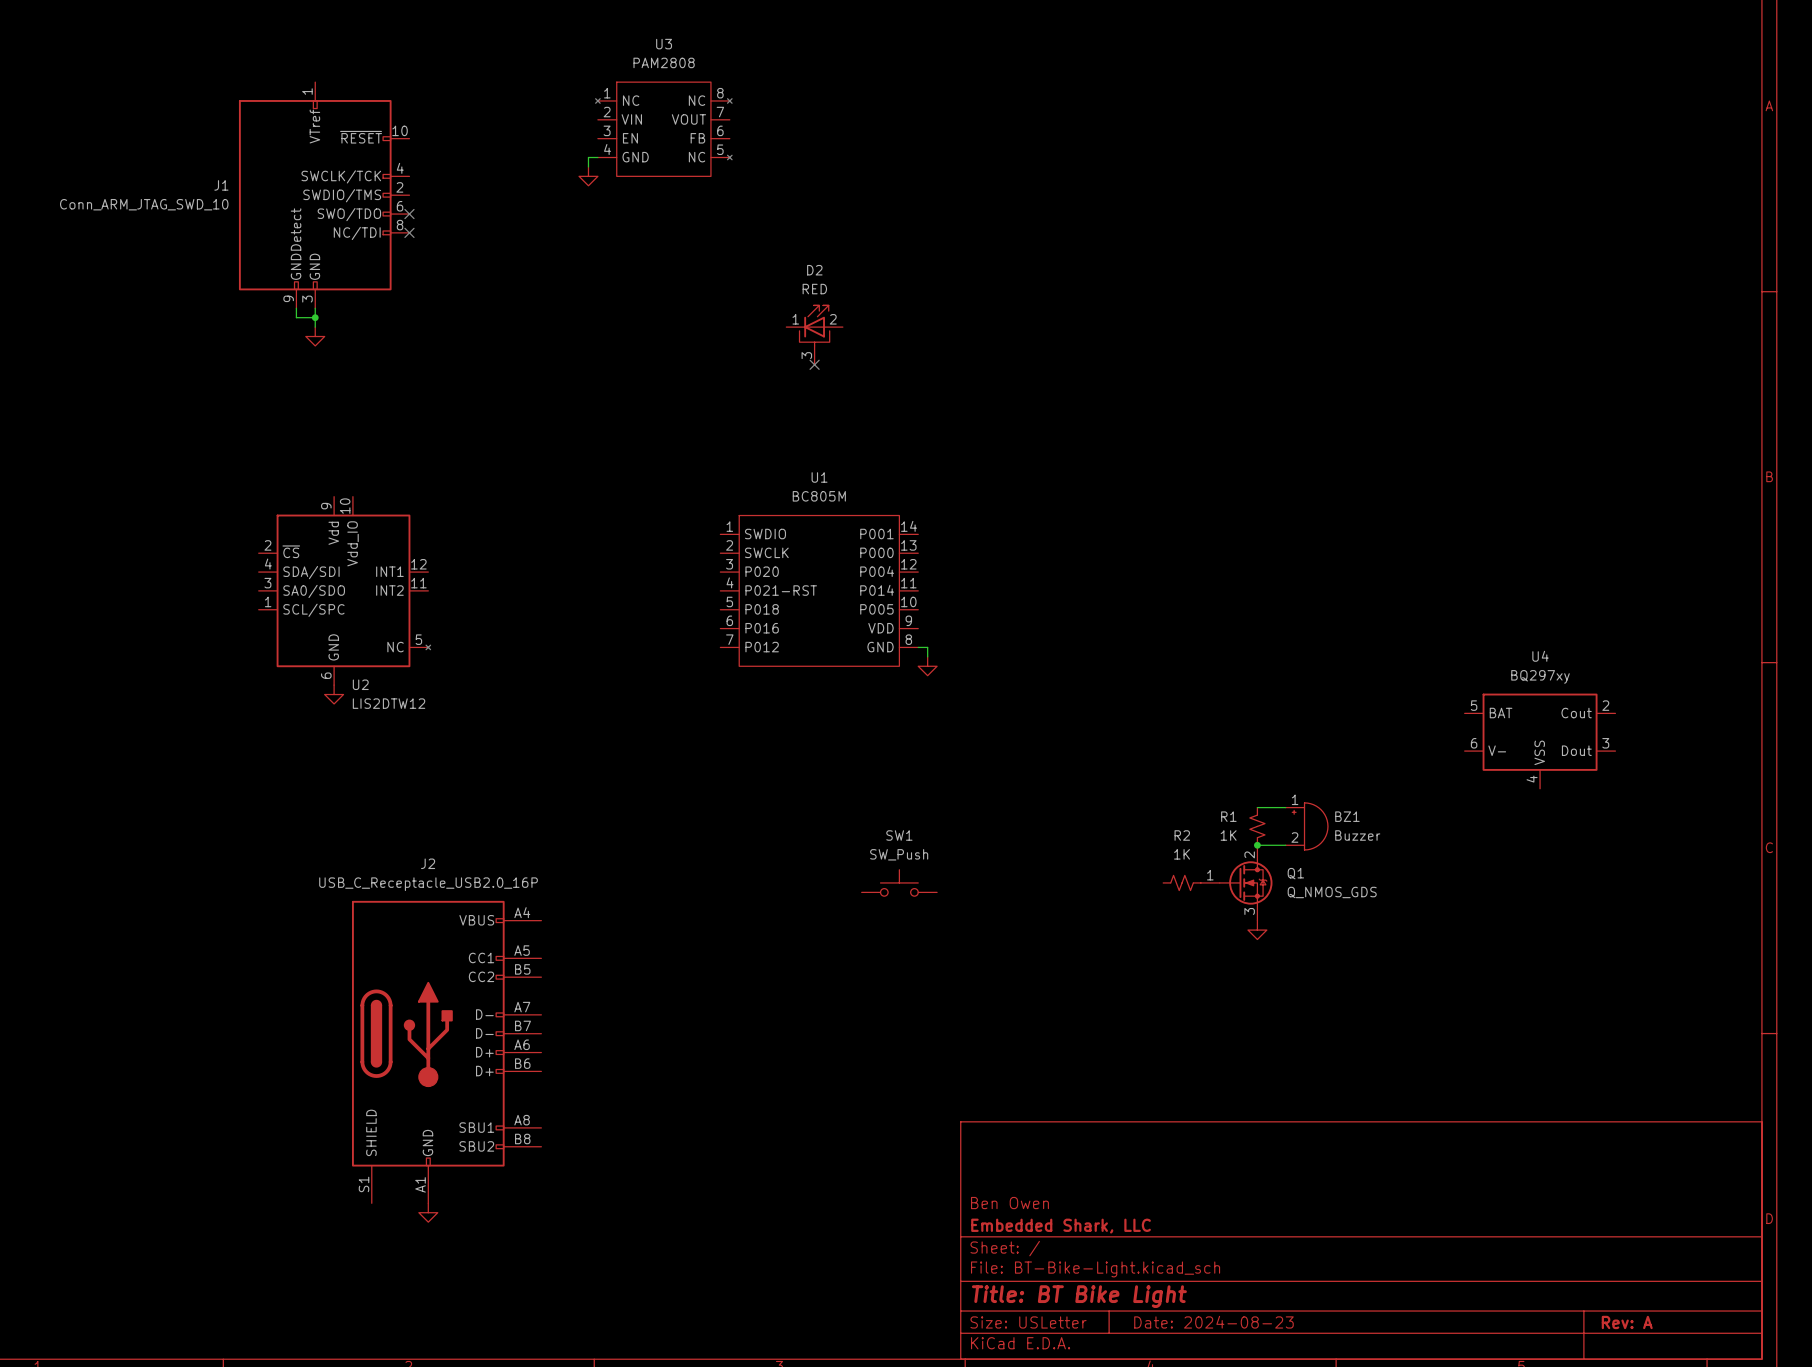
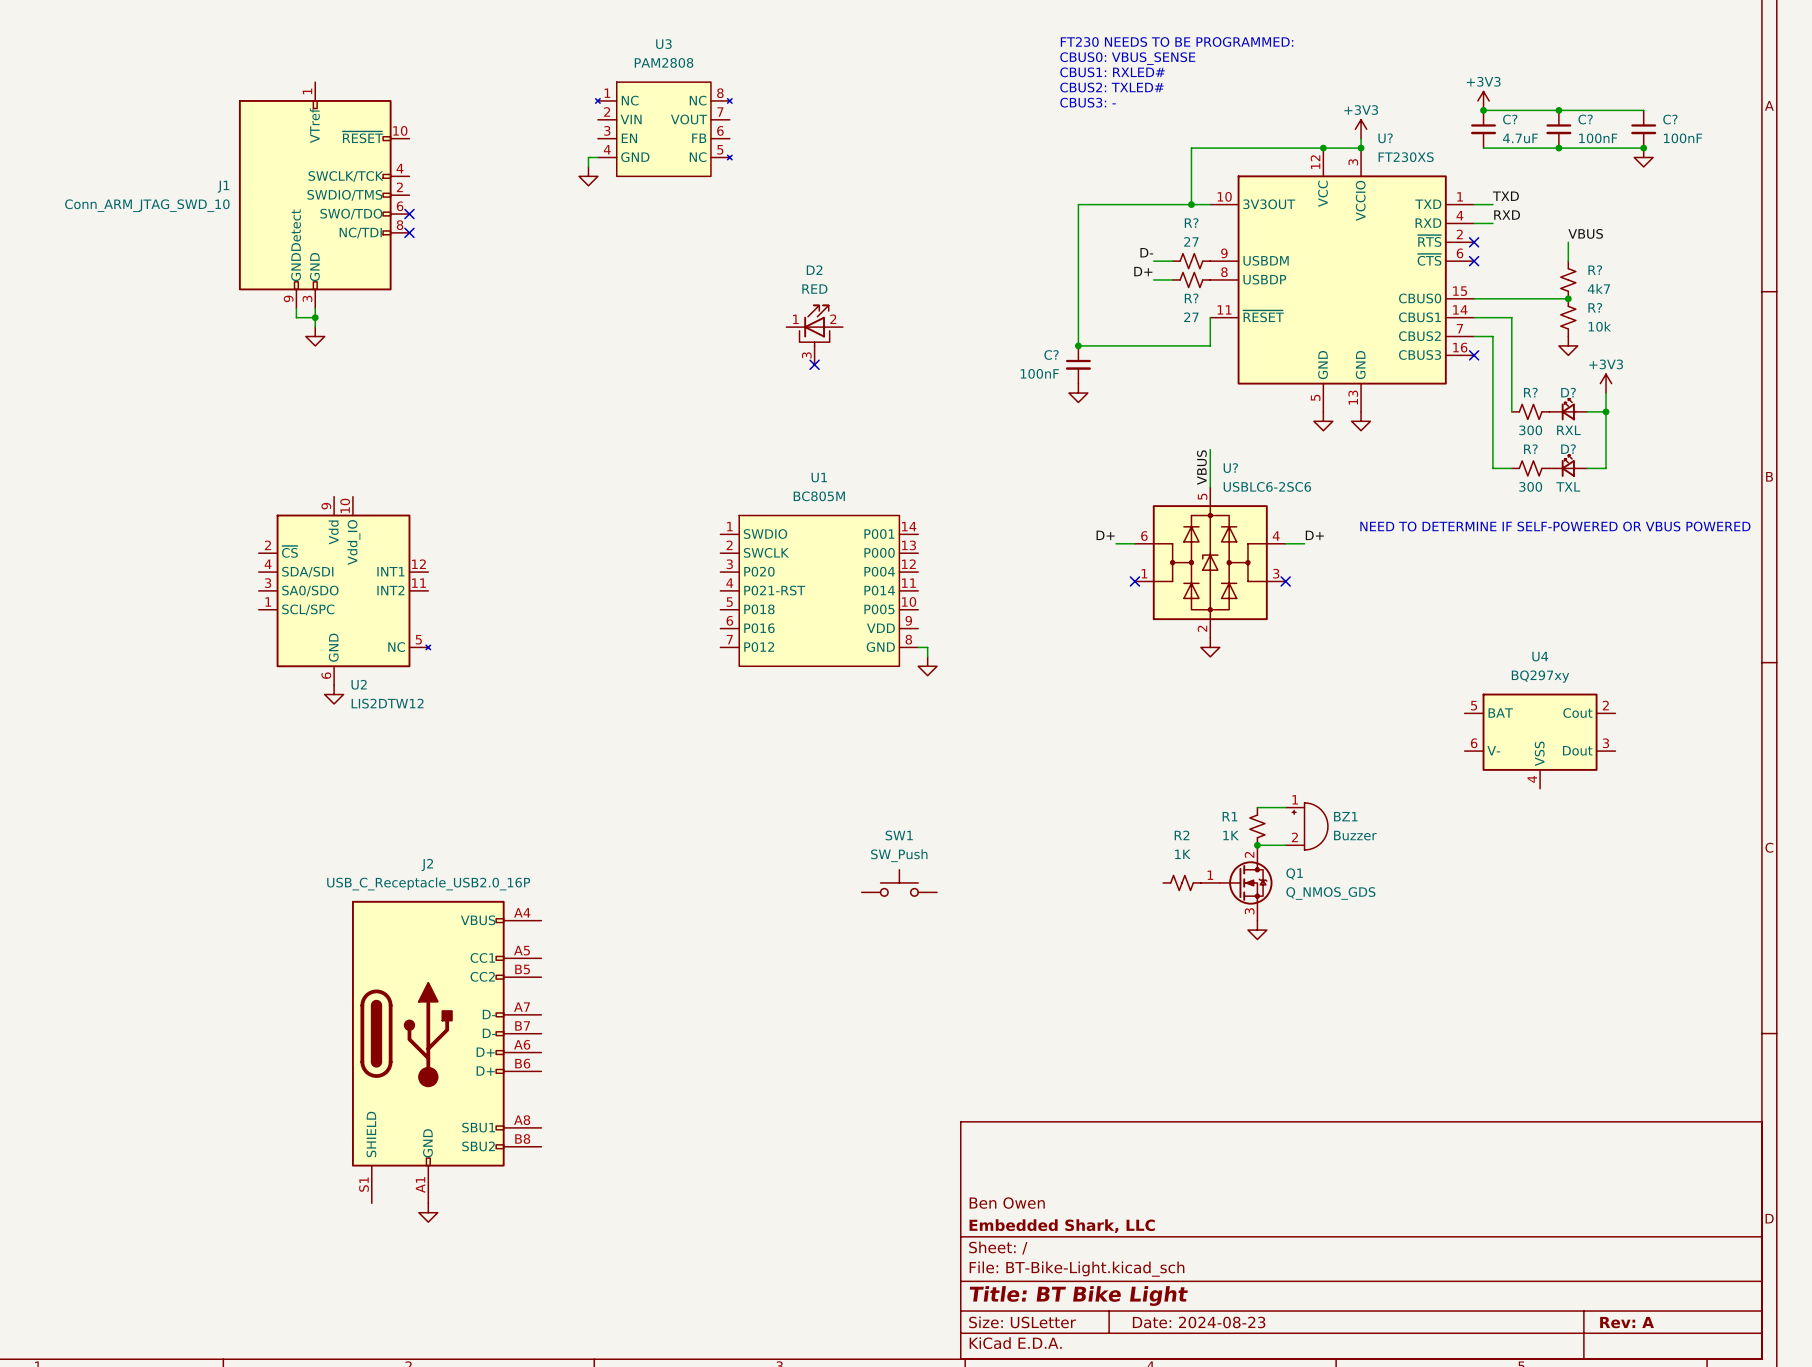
text: none -> FT230 NEEDS TO BE PROGRAMMED: (1177, 42)
text: none -> CBUS0: VBUS_SENSE (1127, 58)
text: none -> CBUS1: RXLED# (1112, 72)
text: none -> CBUS2: TXLED# (1111, 87)
power symbol: none -> +3V3 (1483, 100)
text: none -> CBUS3: - (1088, 102)
wire: none -> (1483, 110) (1643, 110)
junction: none -> (1483, 110)
junction: none -> (1558, 110)
power symbol: none -> +3V3 (1361, 129)
C?: none -> 4.7uF (1483, 129)
C?: none -> 100nF (1558, 129)
C?: none -> 100nF (1643, 129)
wire: none -> (1361, 138) (1361, 148) (1191, 148) (1191, 204)
junction: none -> (1323, 148)
junction: none -> (1361, 148)
wire: none -> (1483, 148) (1643, 148)
junction: none -> (1558, 148)
junction: none -> (1643, 148)
power symbol: none -> (1643, 157)
label: none -> TXD (1505, 196)
junction: none -> (1191, 204)
wire: none -> (1210, 204) (1078, 204) (1078, 345) (1210, 345) (1210, 317)
wire: none -> (1474, 204) (1492, 204)
label: none -> RXD (1507, 215)
wire: none -> (1474, 223) (1492, 223)
label: none -> VBUS (1585, 233)
no-connect mark: none -> (1474, 242)
wire: none -> (1568, 242) (1568, 261)
label: none -> D- (1146, 252)
wire: none -> (1153, 261) (1172, 261)
R?: none -> 27 (1191, 261)
no-connect mark: none -> (1474, 261)
label: none -> D+ (1143, 271)
wire: none -> (1153, 279) (1172, 279)
R?: none -> 27 (1191, 279)
U?: none -> FT230XS (1342, 279)
R?: none -> 4k7 (1568, 279)
wire: none -> (1474, 298) (1568, 298)
junction: none -> (1568, 298)
wire: none -> (1474, 317) (1511, 317) (1511, 411)
R?: none -> 10k (1568, 317)
wire: none -> (1474, 336) (1492, 336) (1492, 468) (1511, 468)
junction: none -> (1078, 345)
power symbol: none -> (1568, 345)
no-connect mark: none -> (1474, 355)
C?: none -> 100nF (1078, 364)
power symbol: none -> +3V3 (1606, 383)
power symbol: none -> (1078, 393)
wire: none -> (1606, 393) (1606, 468) (1587, 468)
D?: none -> RXL (1568, 409)
R?: none -> 300 (1530, 411)
wire: none -> (1587, 411) (1606, 411)
junction: none -> (1606, 411)
power symbol: none -> (1323, 421)
power symbol: none -> (1361, 421)
wire: none -> (1210, 449) (1210, 487)
D?: none -> TXL (1568, 466)
label: none -> VBUS (1201, 467)
R?: none -> 300 (1530, 468)
text: none -> NEED TO DETERMINE IF SELF-POWERED OR VBUS POWERED (1555, 526)
label: none -> D+ (1105, 535)
label: none -> D+ (1314, 535)
wire: none -> (1116, 543) (1134, 543)
wire: none -> (1285, 543) (1304, 543)
U?: none -> USBLC6-2SC6 (1210, 562)
no-connect mark: none -> (1134, 581)
no-connect mark: none -> (1285, 581)
power symbol: none -> (1210, 647)

